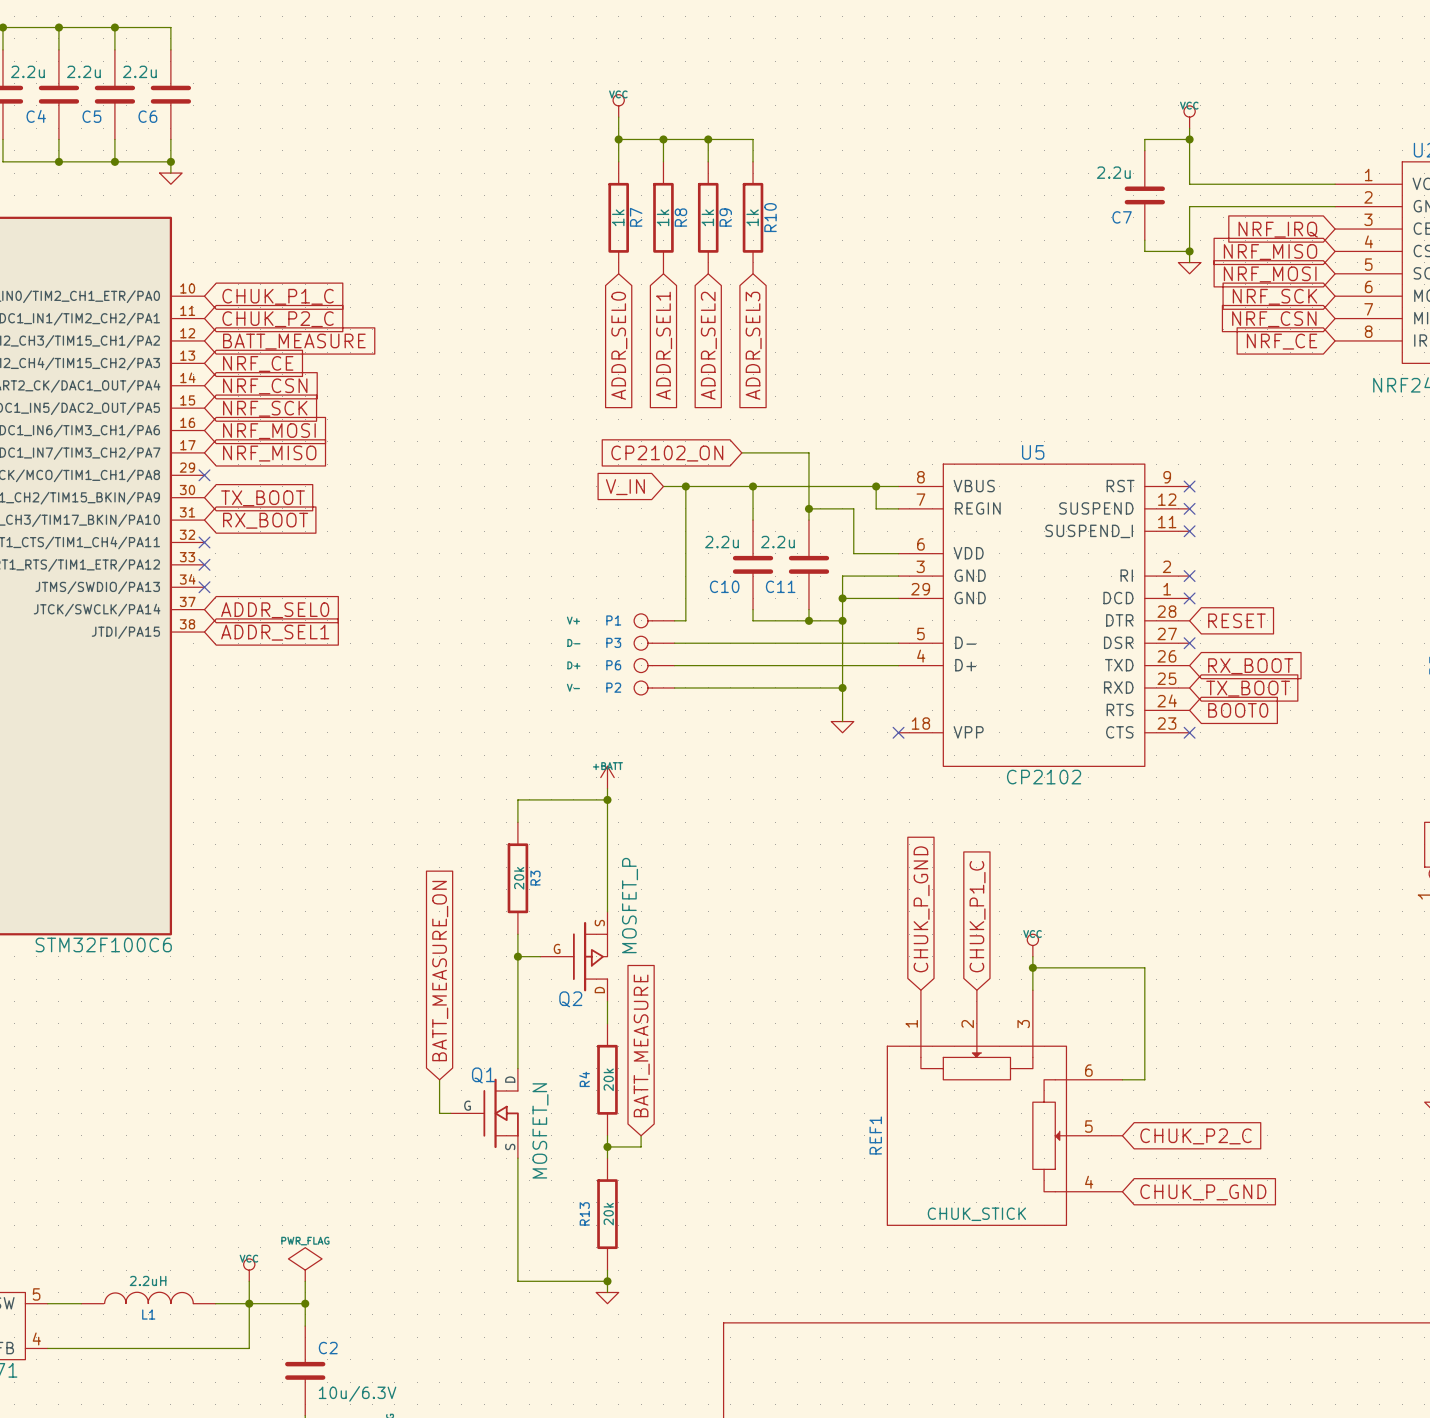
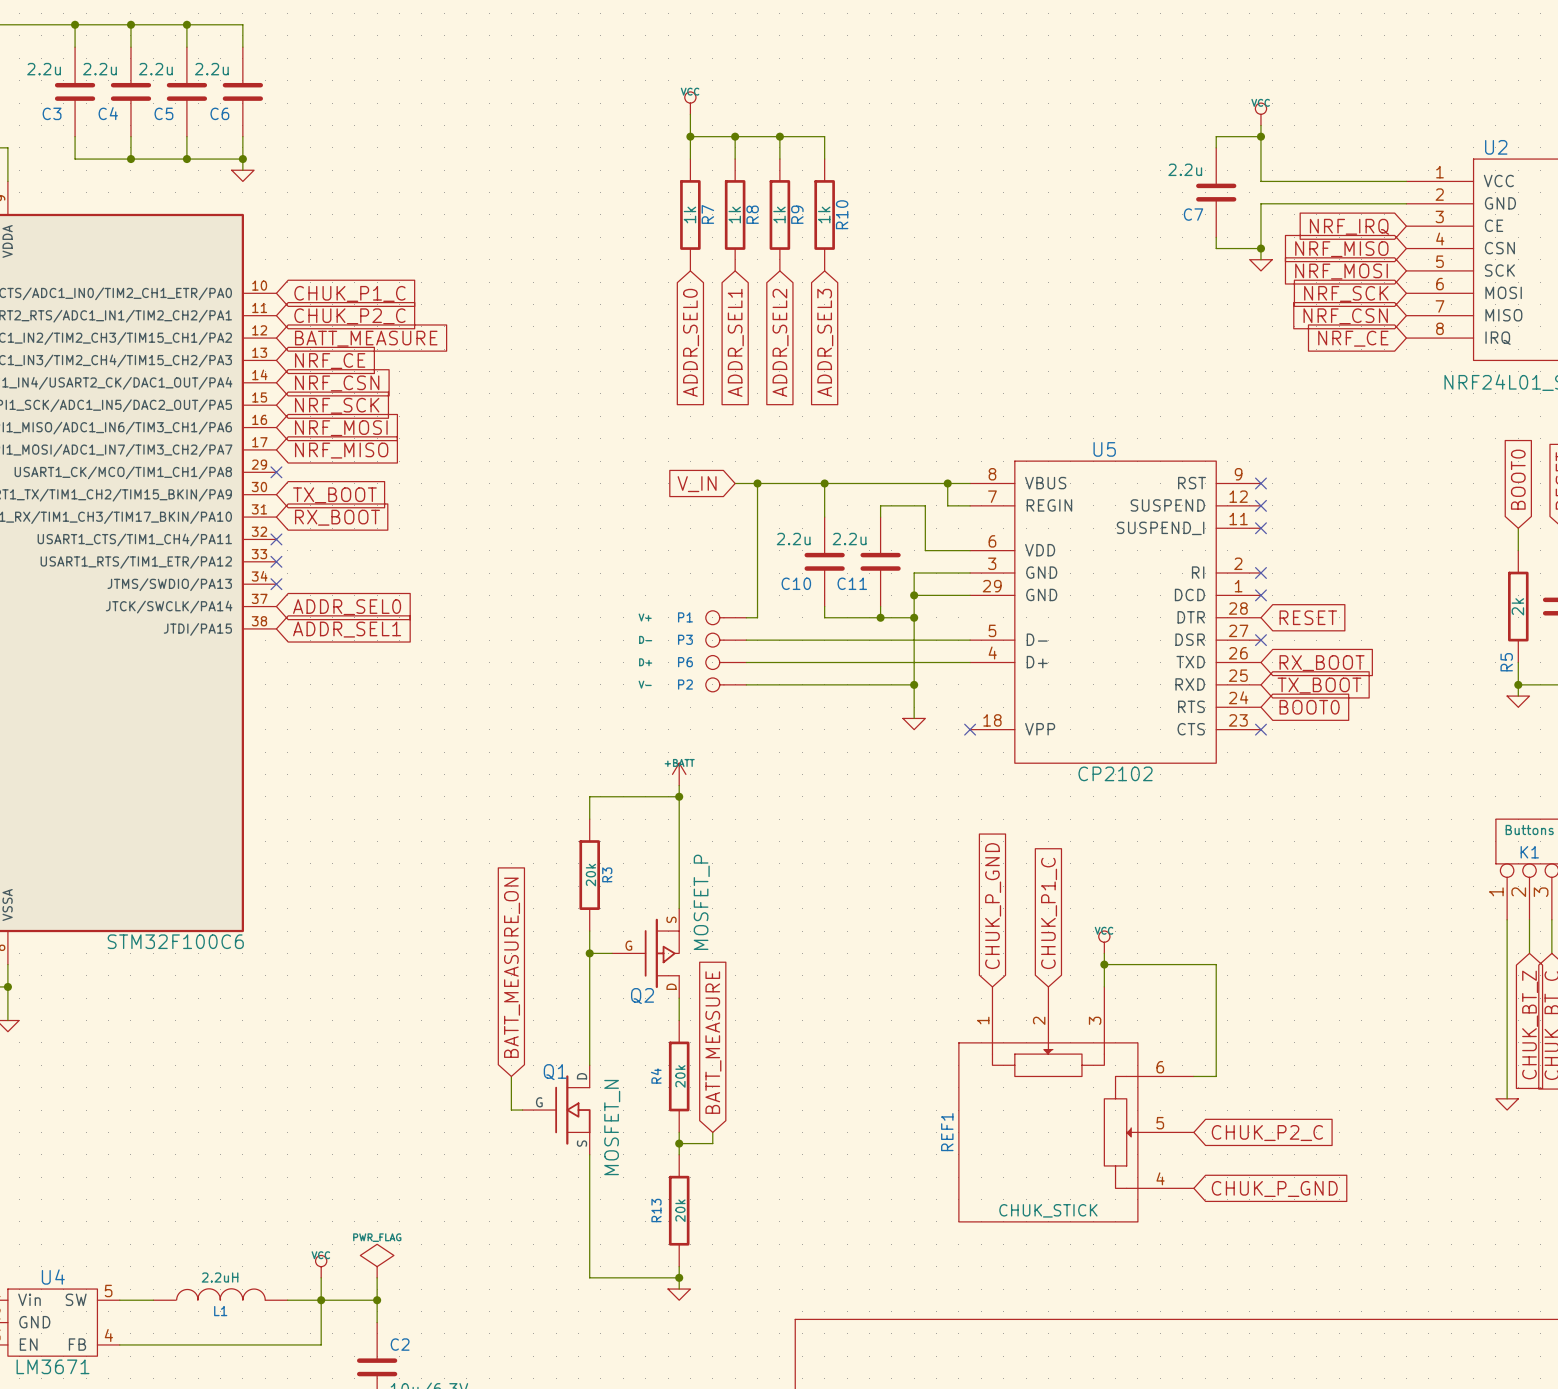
wire: (741, 452) (808, 452) (808, 508) -> none
global label: CP2102_ON (667, 453) -> none
junction: (808, 508) -> none

